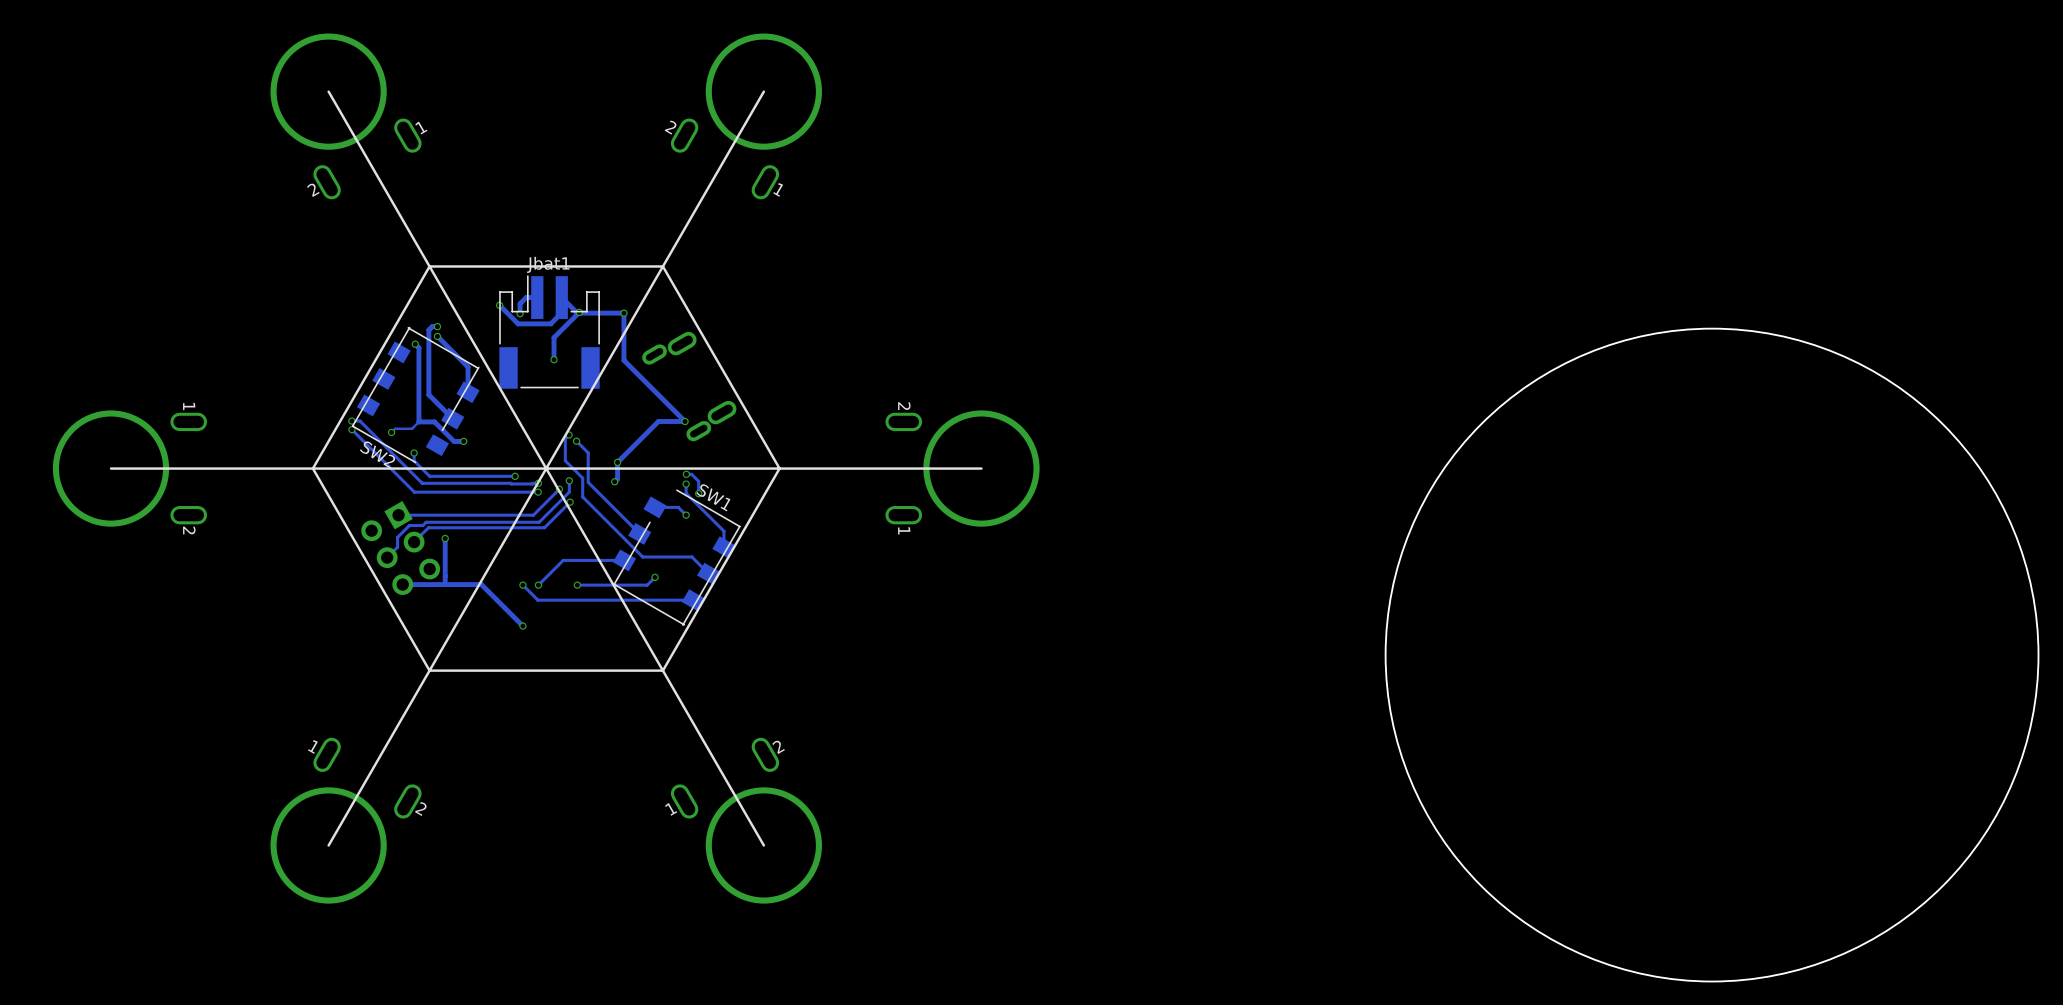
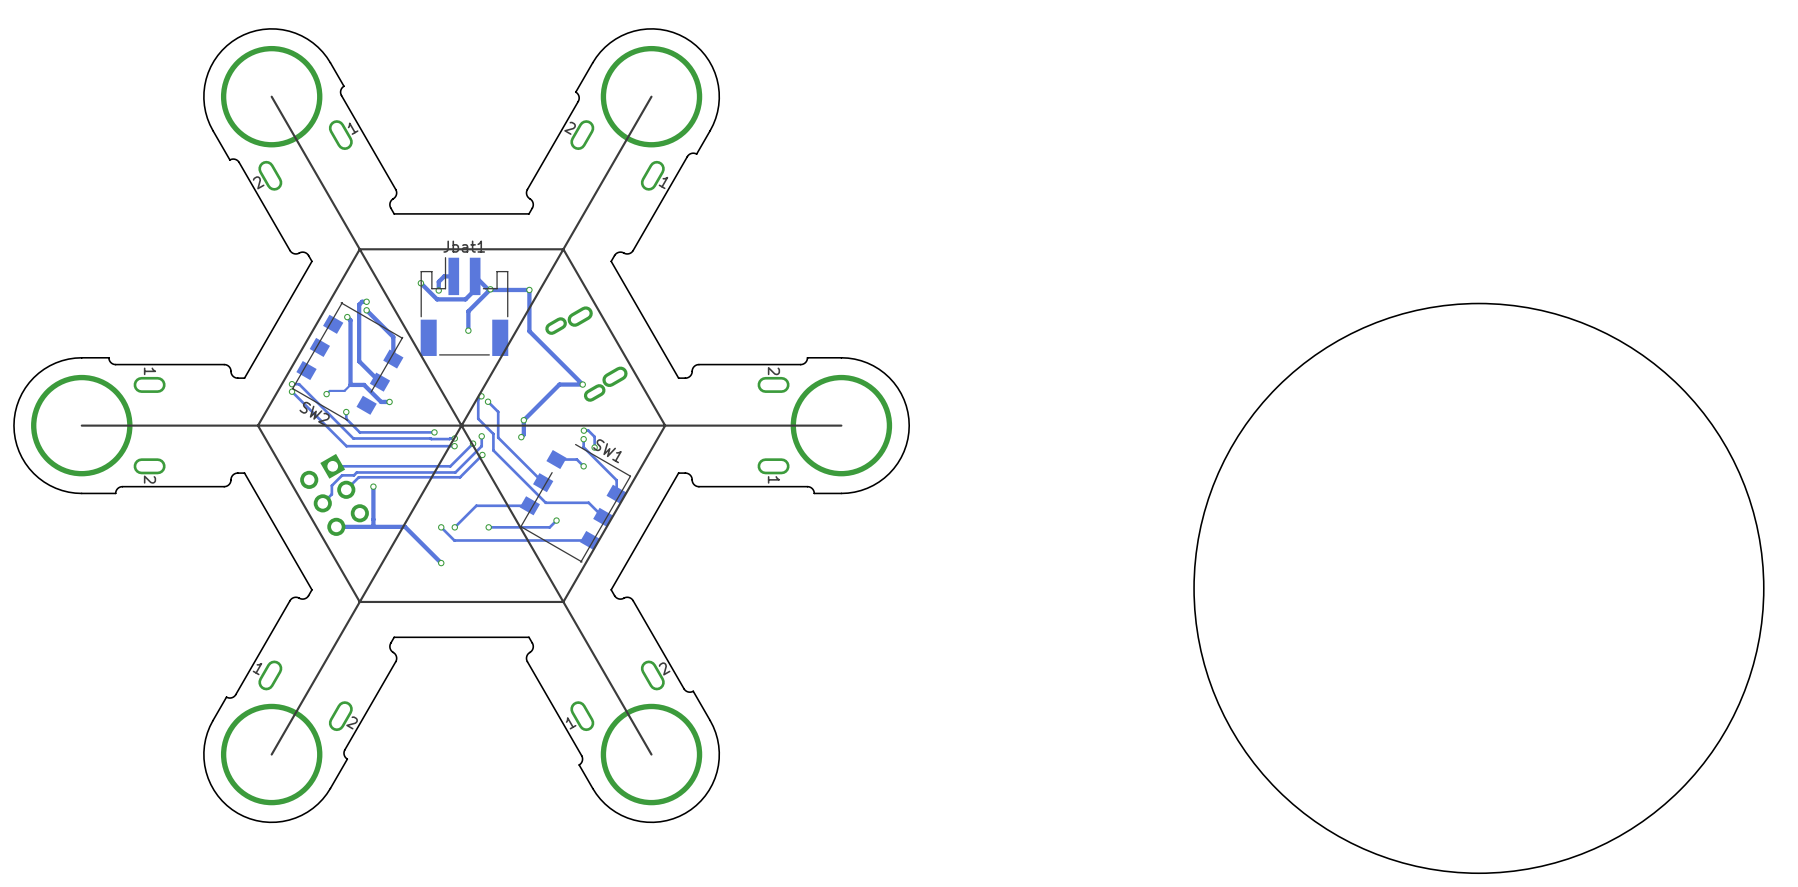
board edge: none -> (807, 357) (854, 359) (879, 369) (893, 382) (901, 393) (906, 405) (909, 425) (906, 445) (901, 457) (893, 468) (879, 482) (861, 490) (848, 493) (814, 493) (812, 488) (807, 486)
board edge: none -> (807, 357) (805, 362) (800, 364) (698, 364) (693, 367) (689, 376) (678, 378) (611, 261) (617, 252) (628, 253) (632, 251) (687, 156) (691, 153) (696, 154) (715, 118) (719, 92) (714, 72) (705, 55) (685, 37) (666, 30) (640, 29) (621, 35) (600, 51) (575, 92) (578, 96) (578, 101) (527, 190) (527, 195) (533, 203) (528, 213) (394, 213) (389, 203) (396, 195) (396, 190) (341, 95) (340, 90) (343, 86) (326, 57) (312, 42) (301, 35) (282, 29) (269, 28) (243, 34) (226, 45) (217, 55) (210, 66) (204, 85) (205, 112) (209, 124) (229, 159) (235, 159) (239, 162) (290, 251) (295, 253) (305, 252) (311, 261) (244, 378) (237, 378)
board edge: none -> (115, 364) (110, 362) (108, 357) (68, 359) (49, 365) (29, 382) (16, 405) (13, 425) (16, 445) (29, 468) (38, 478) (55, 488) (81, 493) (115, 493) (117, 488) (122, 486) (225, 486) (229, 484) (233, 474) (244, 473) (311, 589) (305, 598) (295, 597) (290, 599) (235, 694) (231, 697) (226, 697) (209, 726) (205, 739) (204, 765) (214, 790) (232, 809) (256, 820) (276, 822) (295, 818) (312, 808) (326, 794) (347, 759) (344, 754) (344, 749) (396, 660) (396, 655) (389, 647) (394, 637) (528, 637) (533, 647) (527, 655) (527, 660) (581, 755) (582, 760) (579, 764) (600, 799) (621, 815) (647, 822) (666, 820) (690, 809) (705, 795) (714, 778) (719, 752) (715, 732) (693, 691) (688, 691) (684, 688) (632, 599) (628, 597) (617, 598) (611, 589) (678, 473) (688, 474) (693, 484) (698, 486)
board edge: none -> (115, 364) (225, 364) (229, 367) (232, 376) (237, 378)
board edge: none -> (807, 486) (698, 486)

